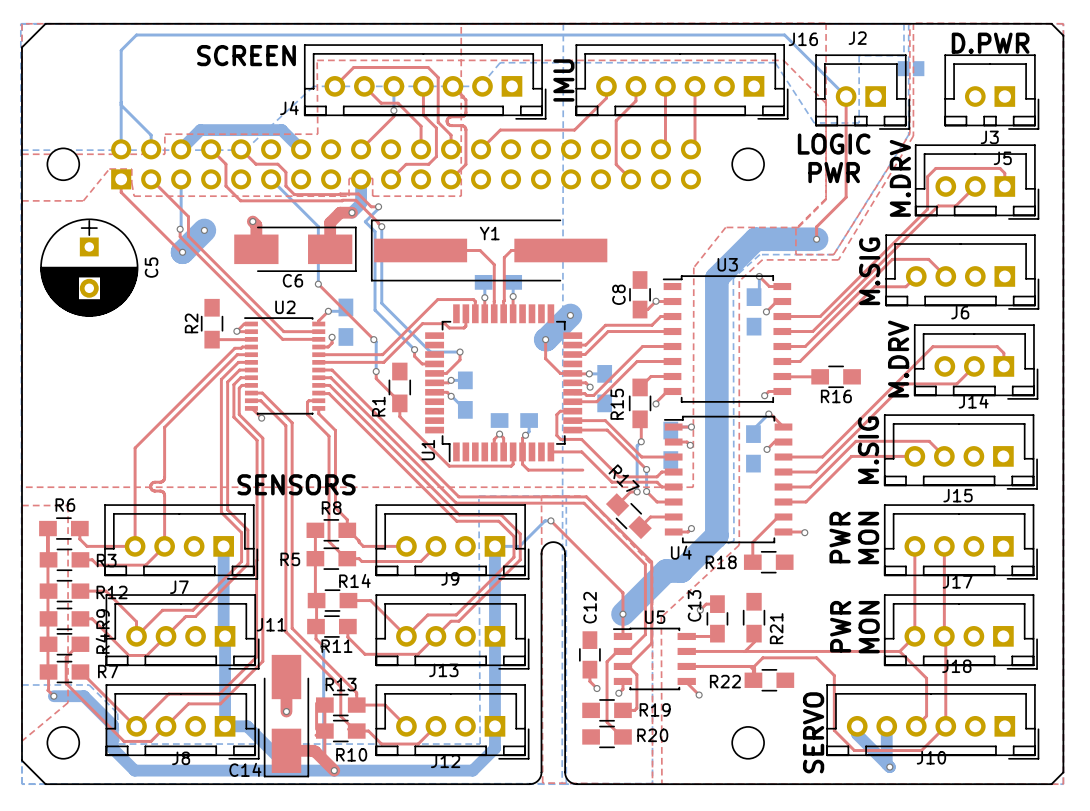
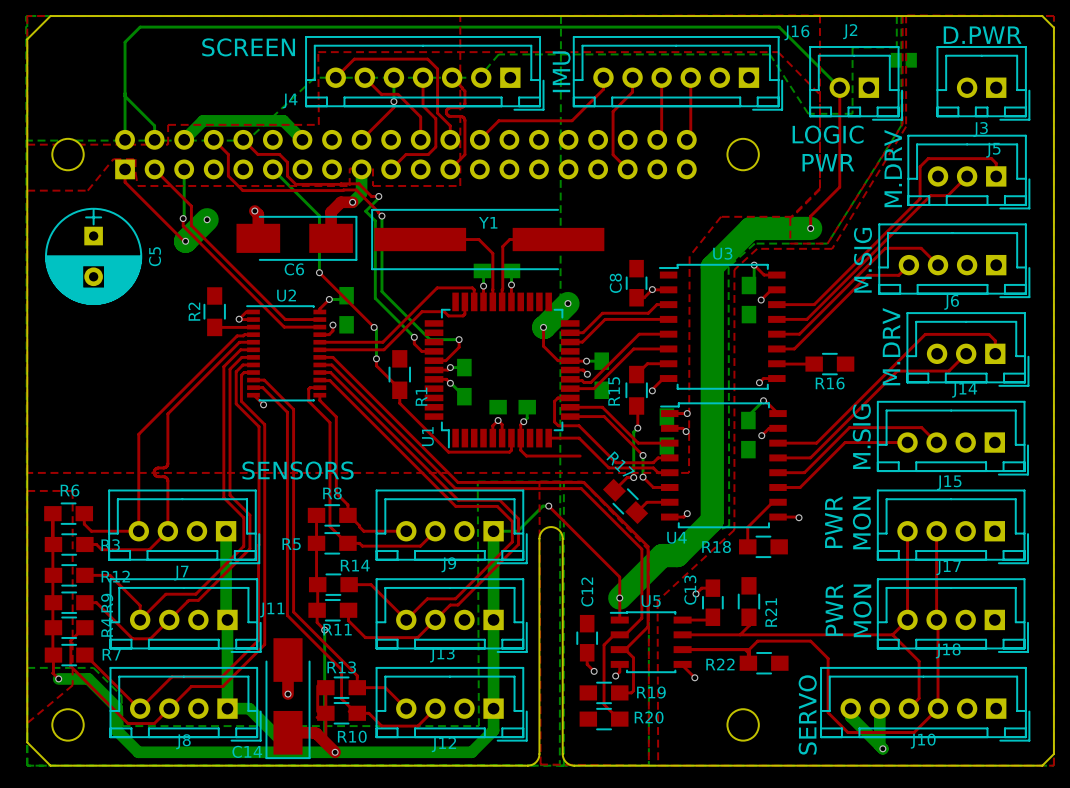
R1 name position: R1 (378, 406) -> R1 (421, 396)

